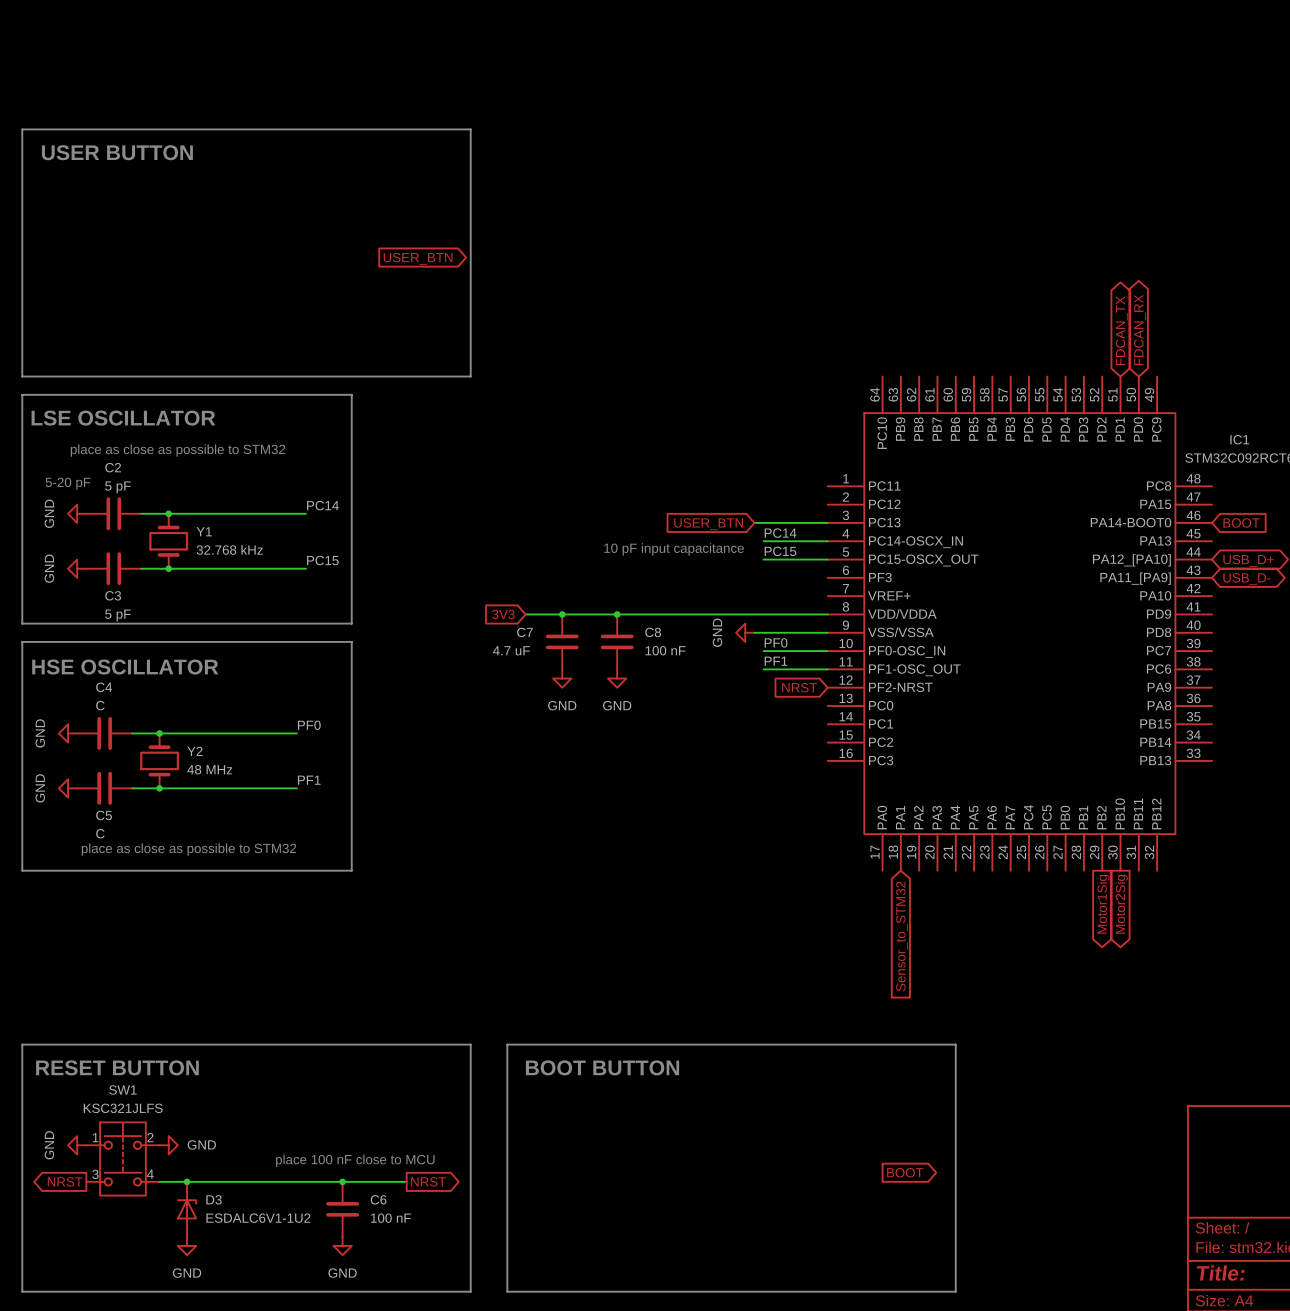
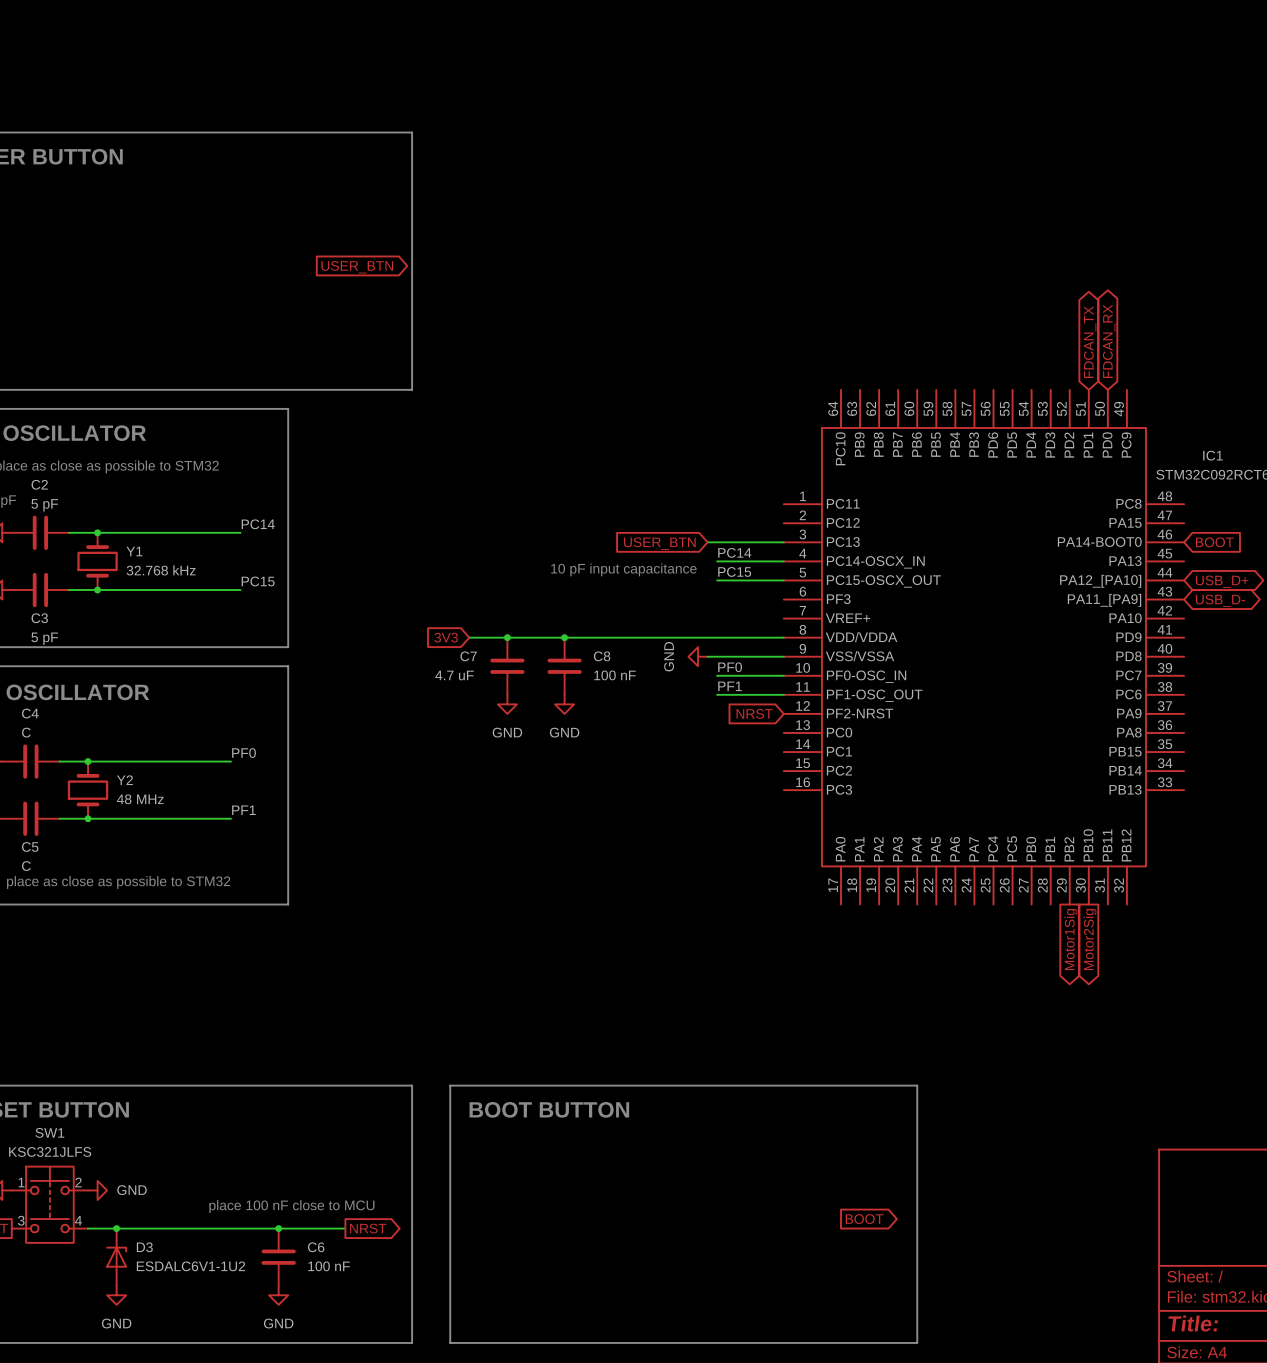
global label: Sensor_to_STM32 (902, 936) -> none

